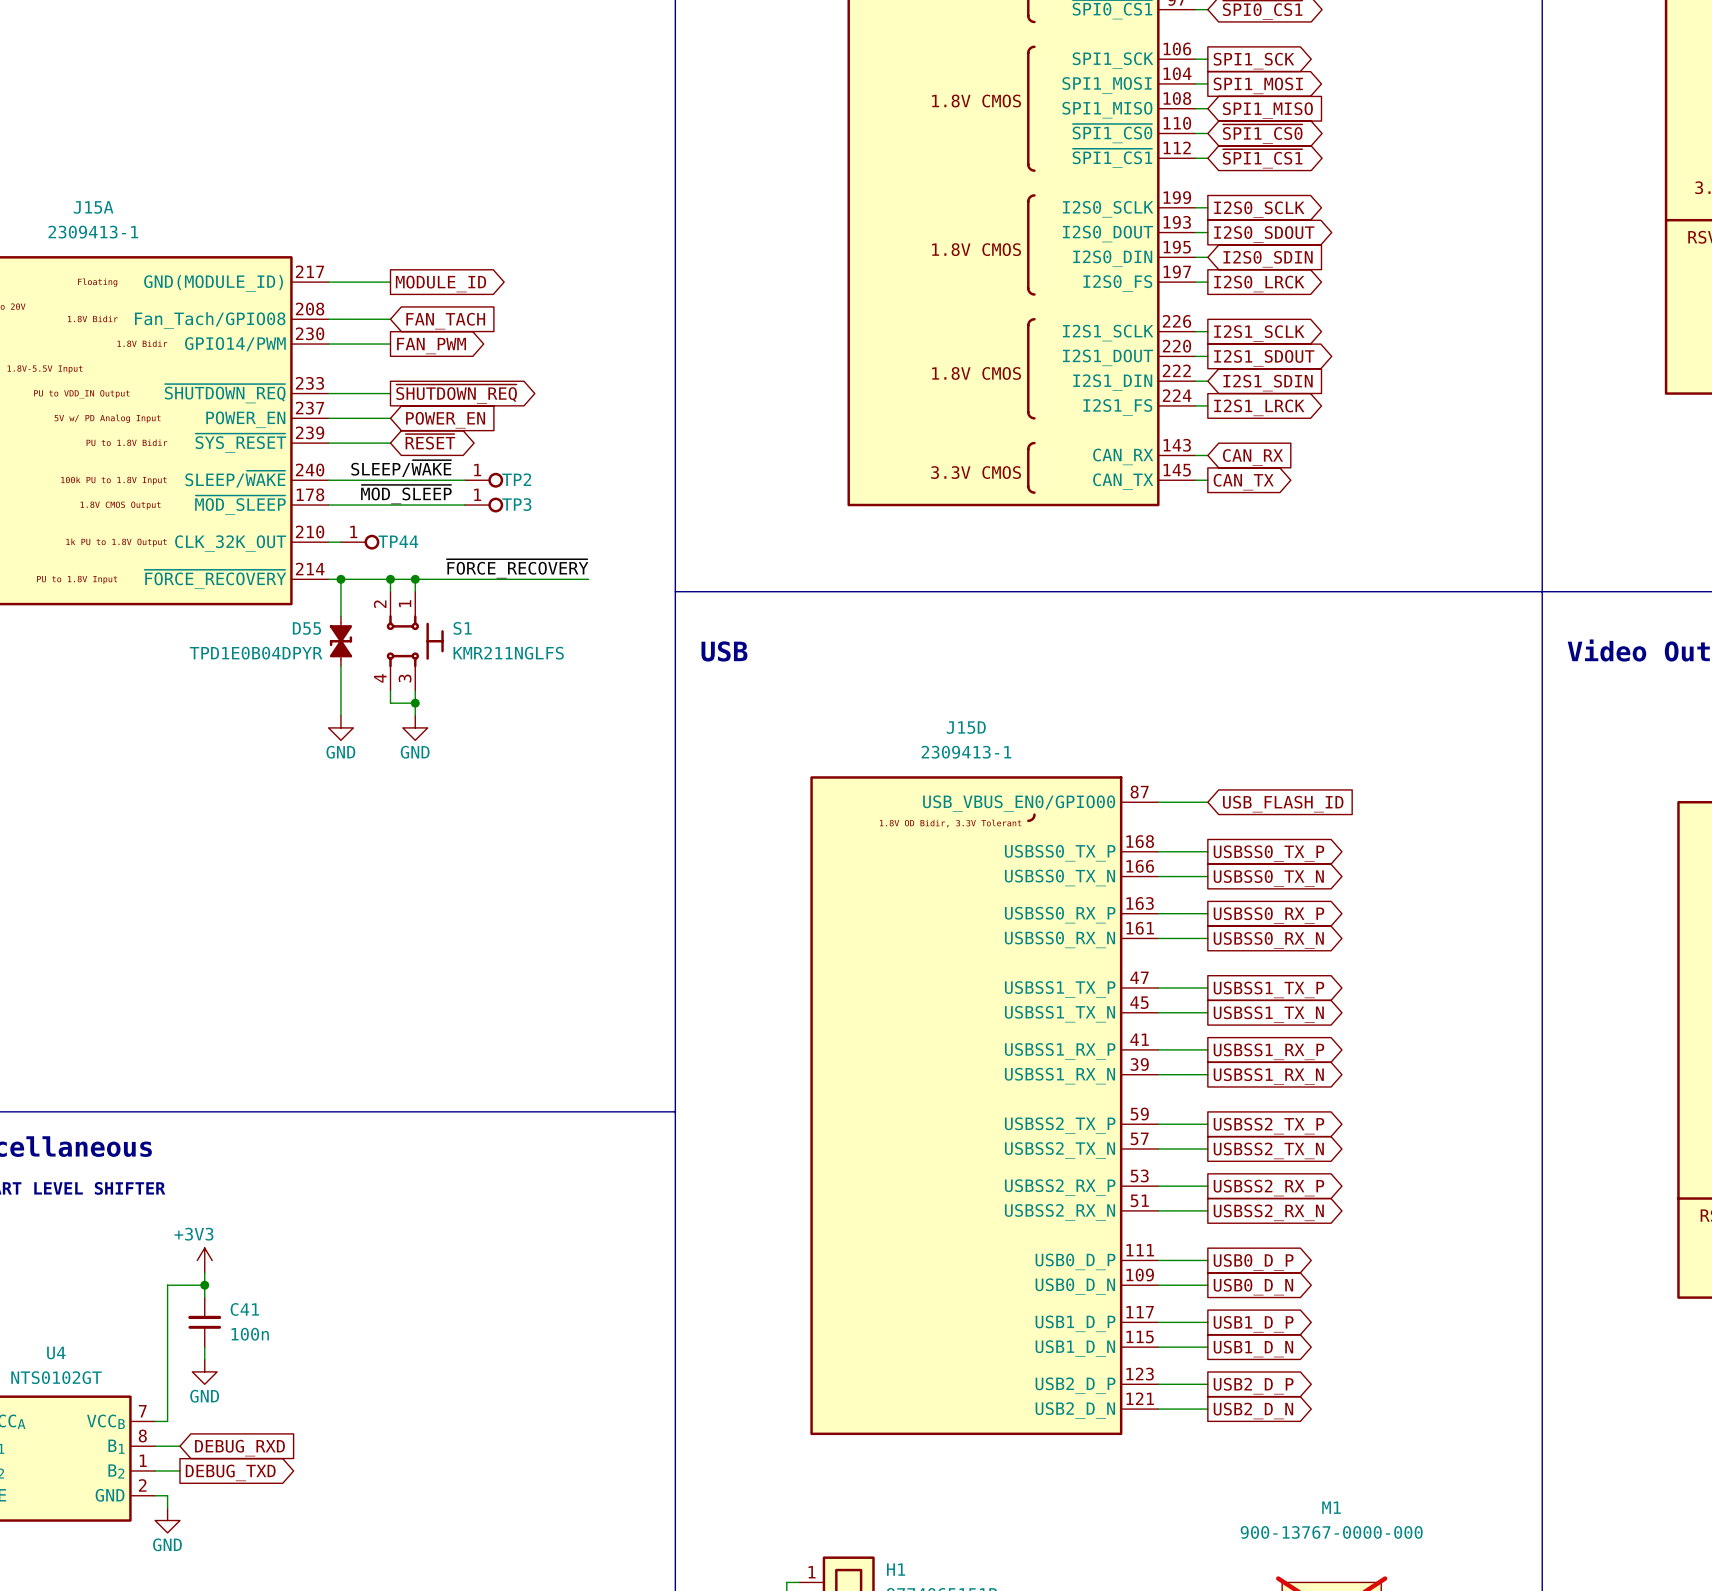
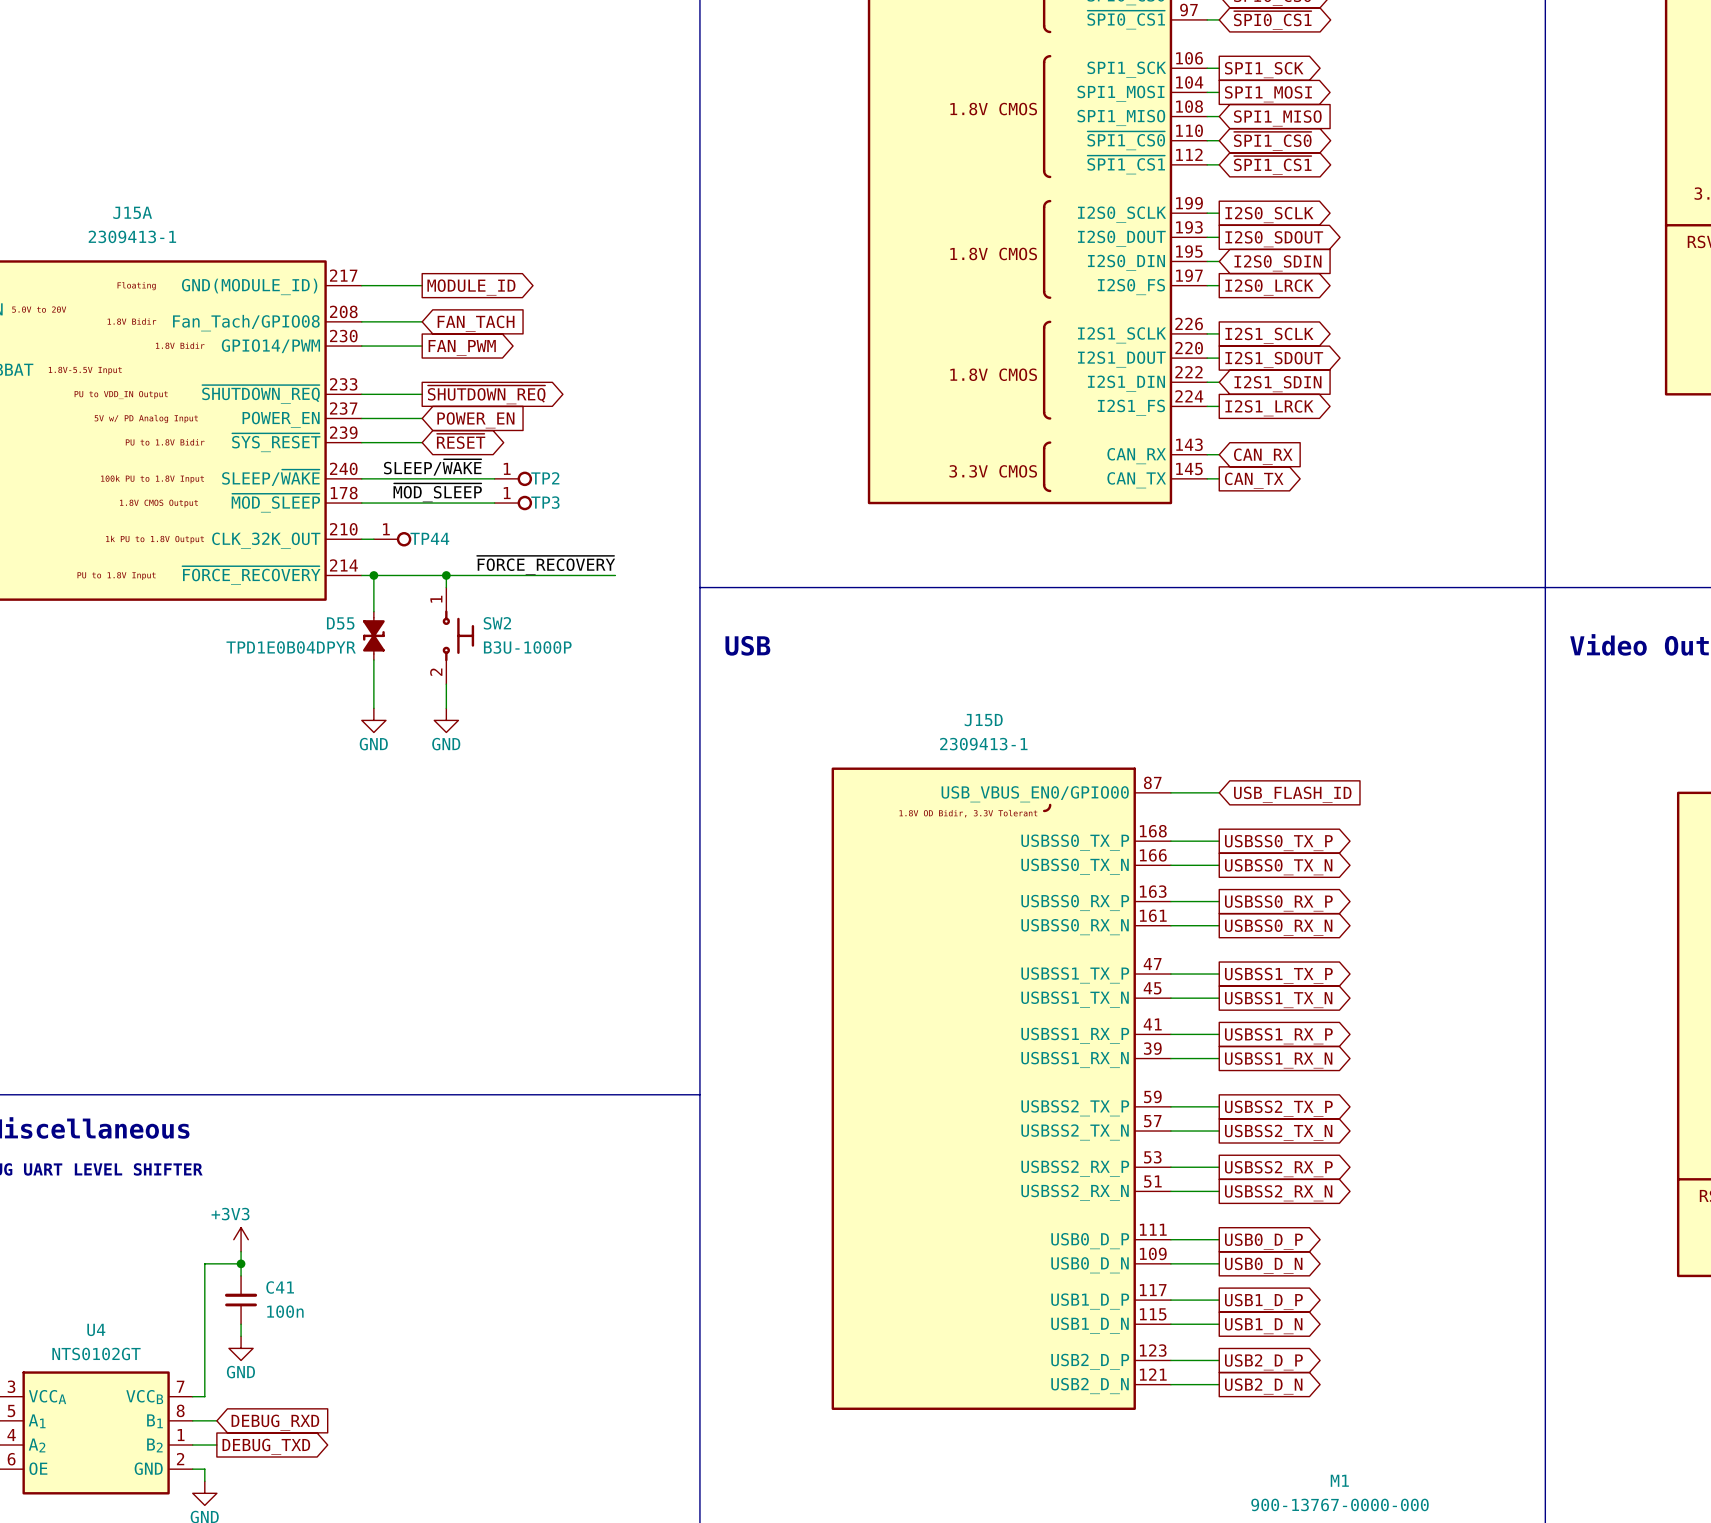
wire: (390, 579) (390, 591) -> none
junction: (390, 579) -> none
S1: (415, 641) -> none
SW2: none -> (458, 635)
wire: (390, 690) (390, 703) (415, 703) -> none
junction: (415, 703) -> none

